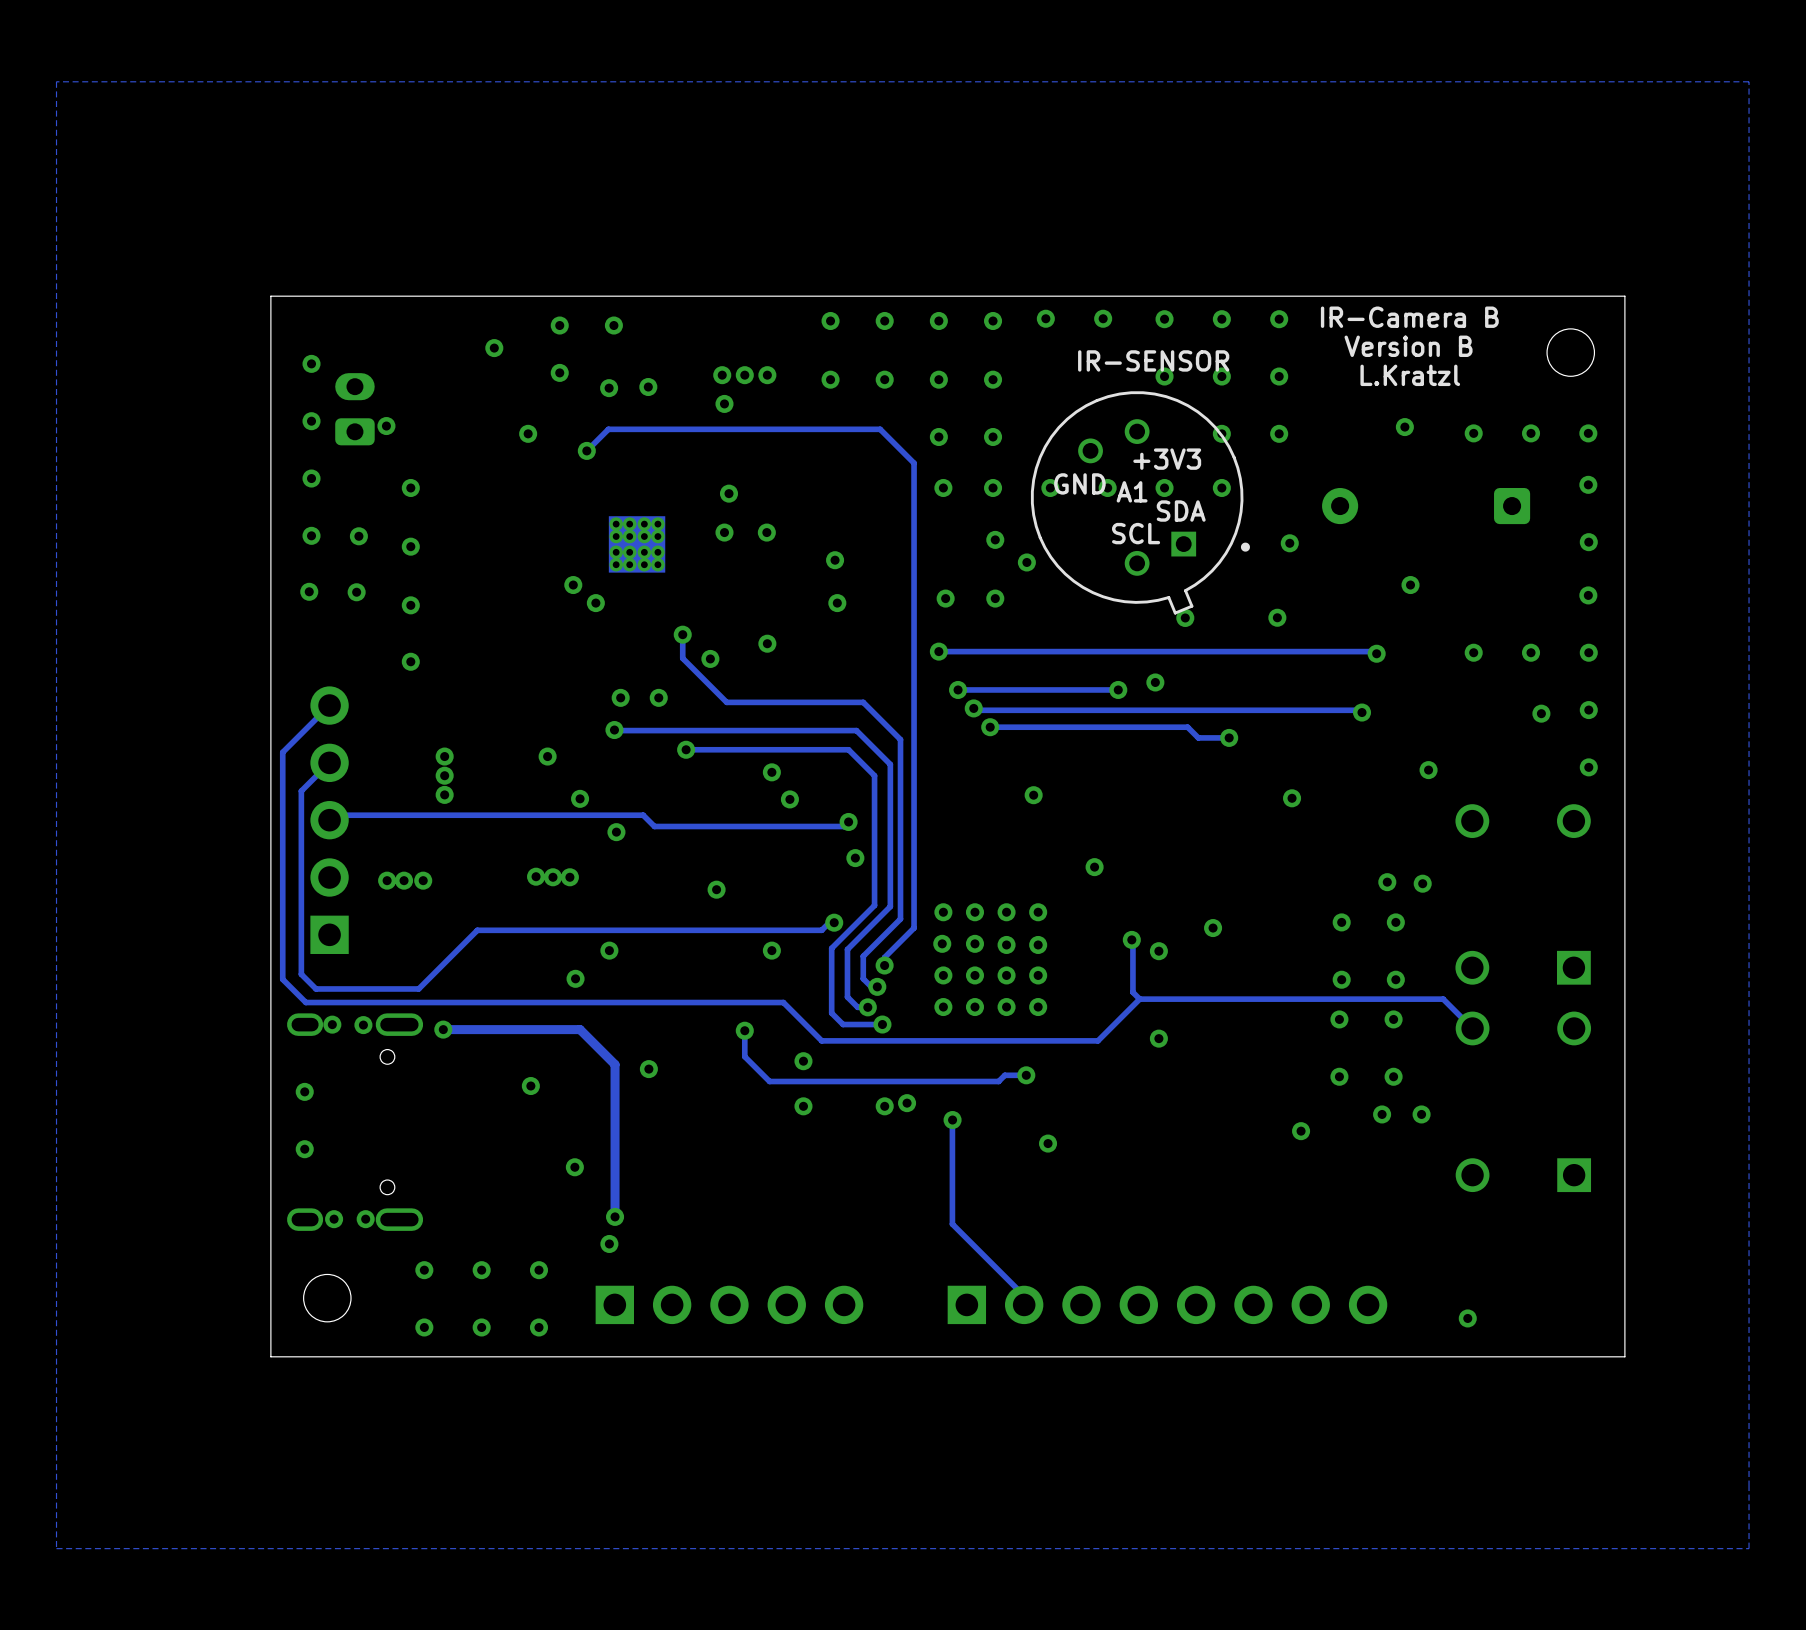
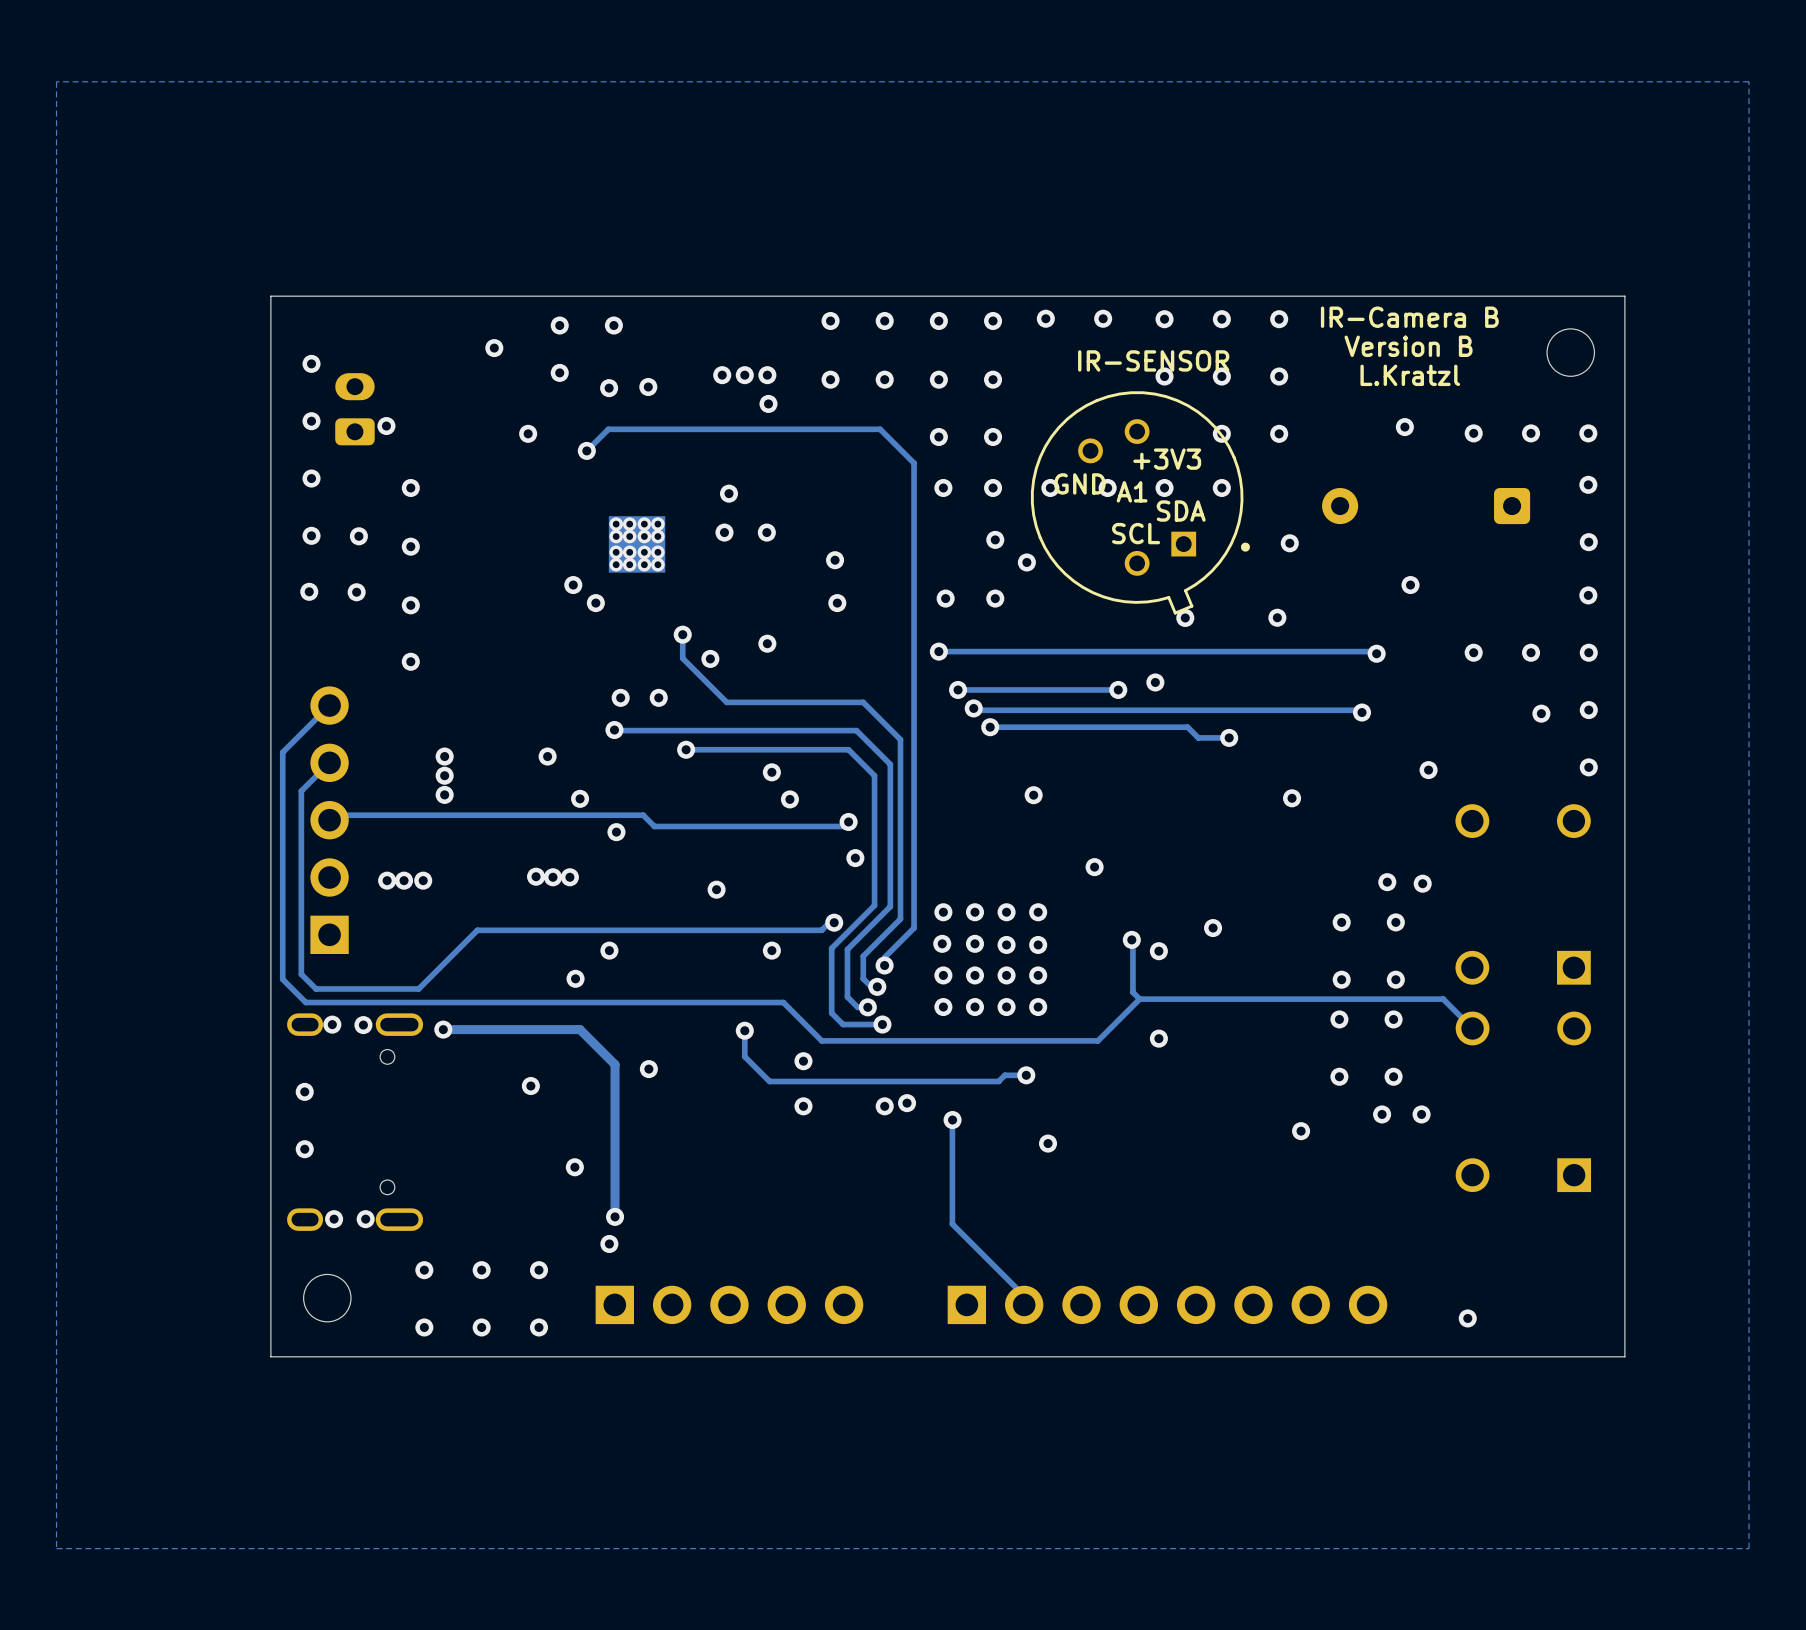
via position: (724, 403) -> (768, 403)

